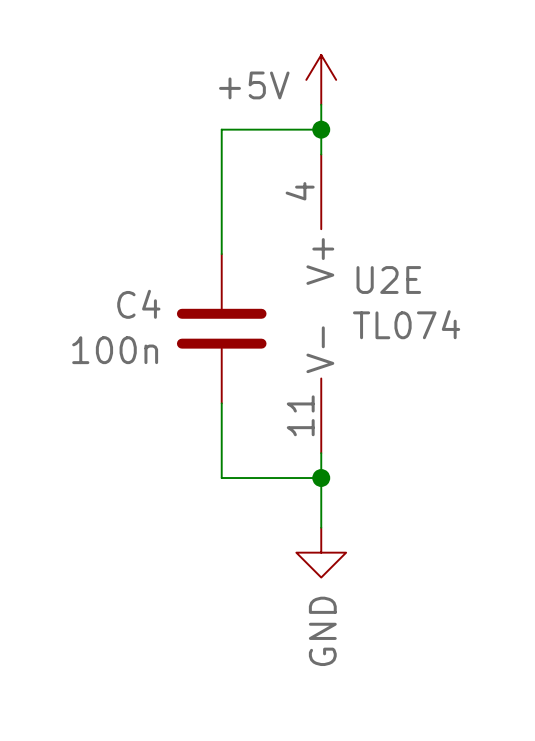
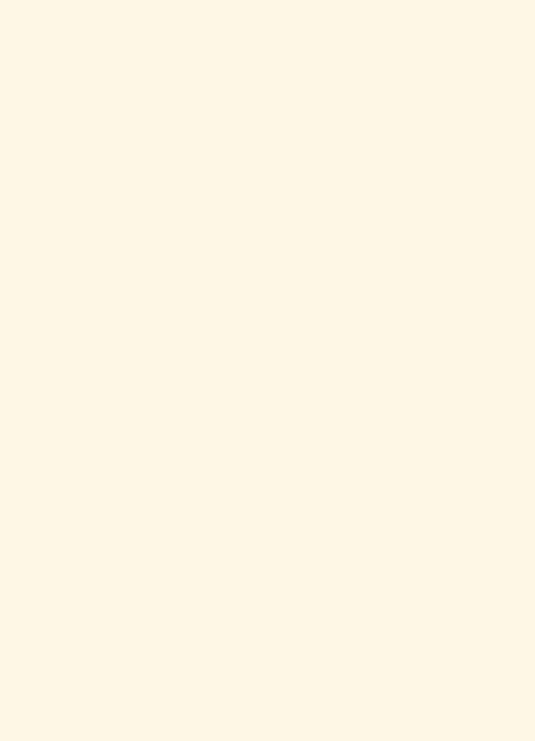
power symbol: +5V (321, 79) -> none
wire: (321, 104) (321, 154) -> none
wire: (321, 129) (221, 129) (221, 254) -> none
junction: (321, 129) -> none
U2E: TL074 (321, 303) -> none
C4: 100n (221, 328) -> none
wire: (221, 403) (221, 478) (321, 478) -> none
wire: (321, 453) (321, 527) -> none
junction: (321, 478) -> none
power symbol: GND (321, 552) -> none

